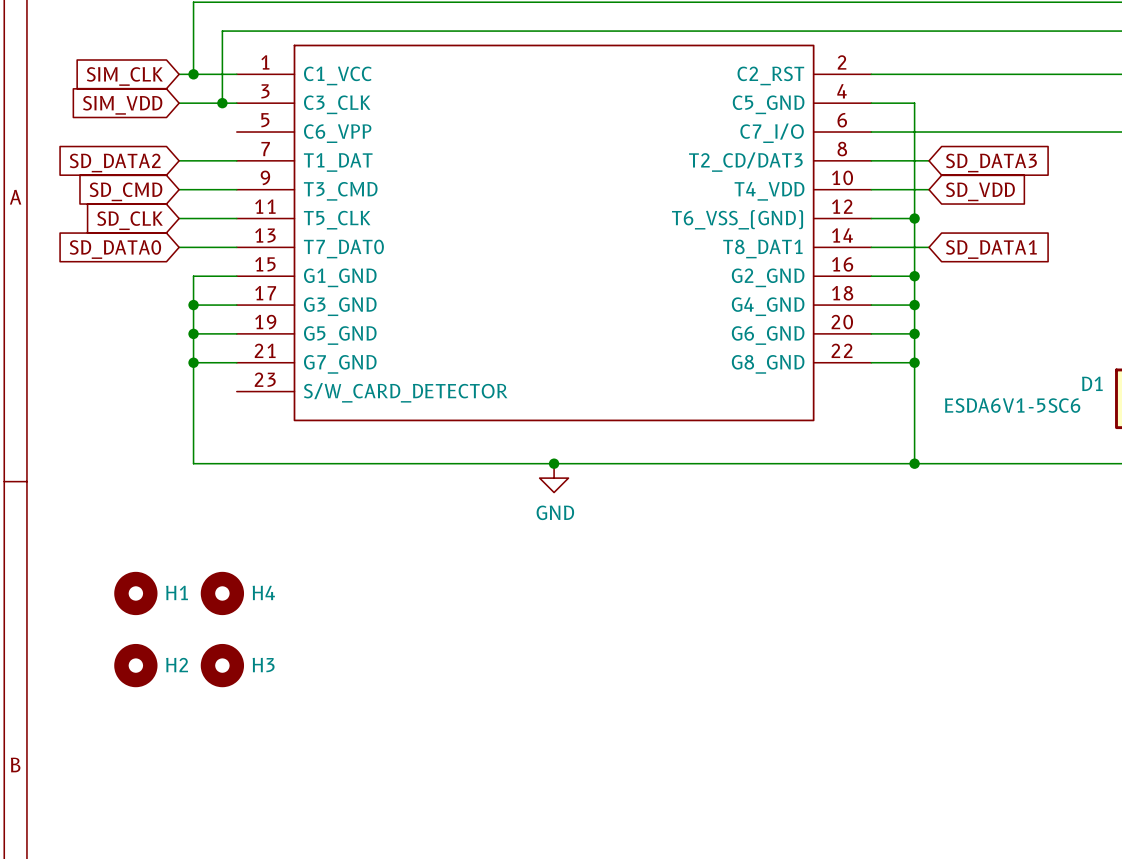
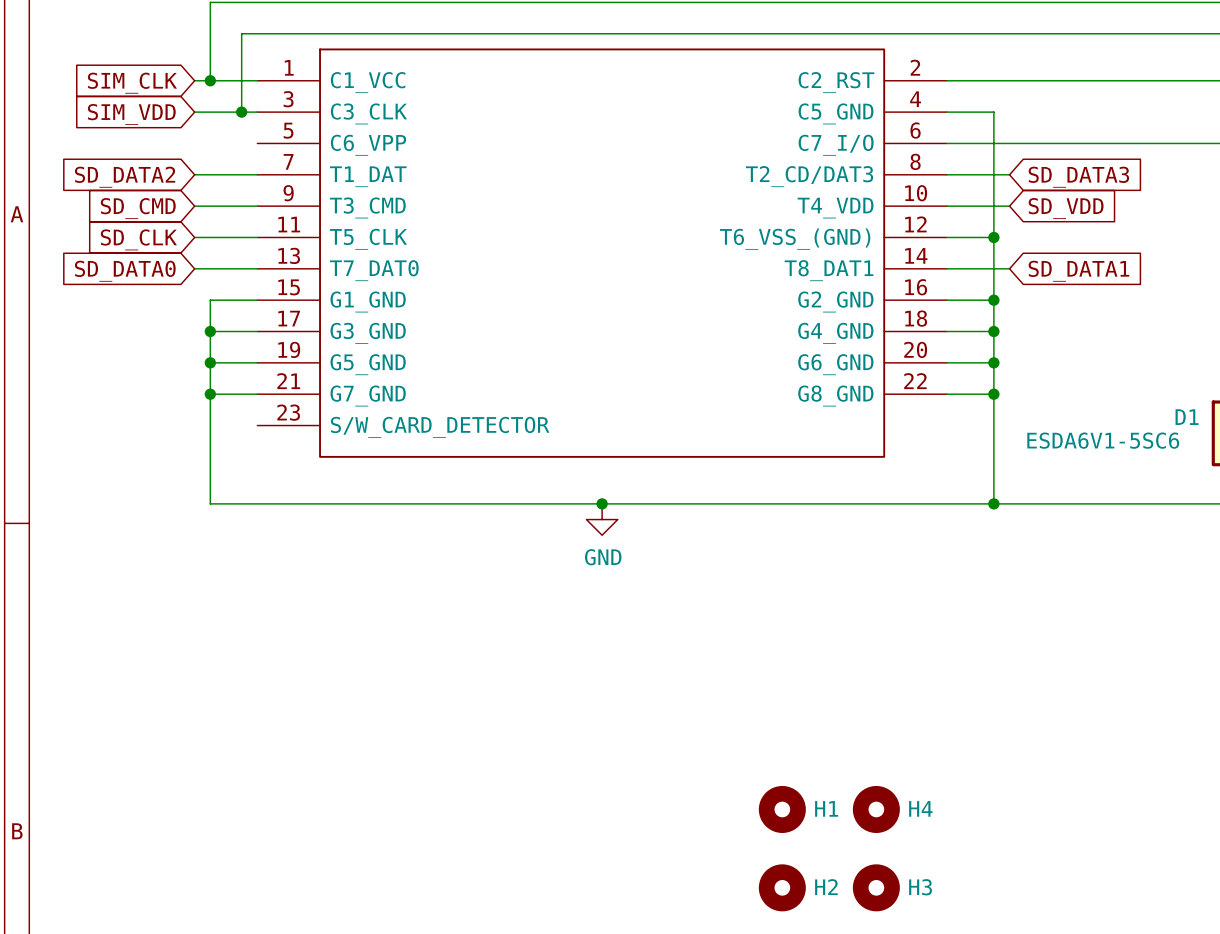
H1 position: (135, 593) -> (782, 809)
H4 position: (222, 593) -> (876, 809)
H2 position: (135, 665) -> (782, 887)
H3 position: (222, 665) -> (876, 887)

